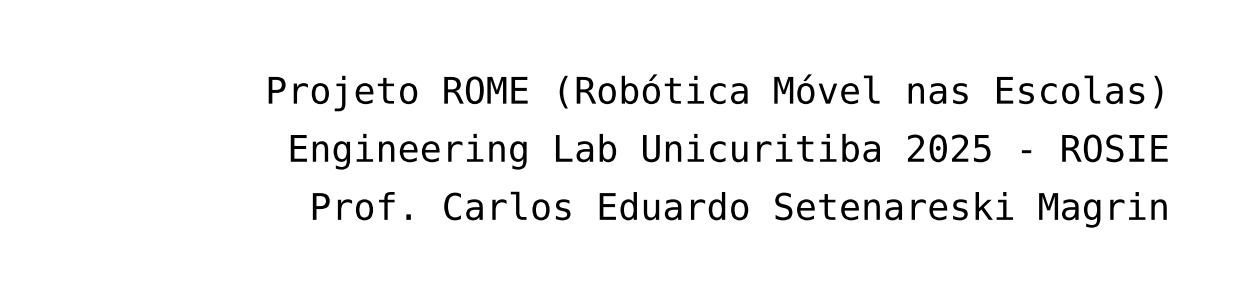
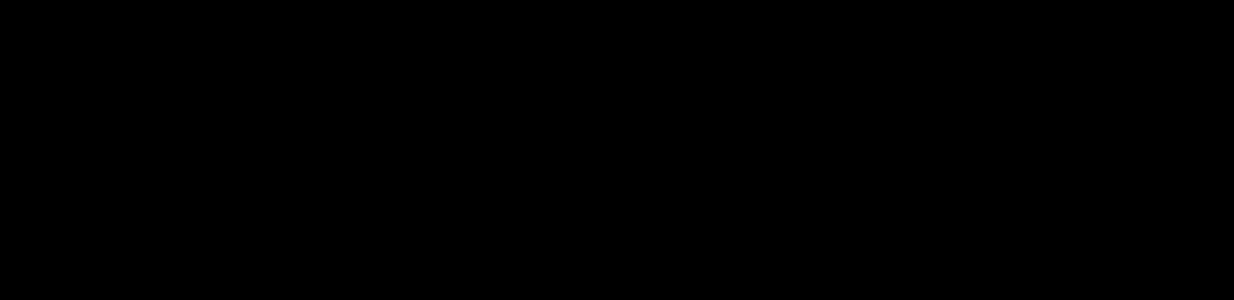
text: Projeto ROME (Robótica Móvel nas Escolas) (715, 92) -> none
text: Engineering Lab Unicuritiba 2025 - ROSIE (729, 151) -> none
text: Prof. Carlos Eduardo Setenareski Magrin (739, 209) -> none

